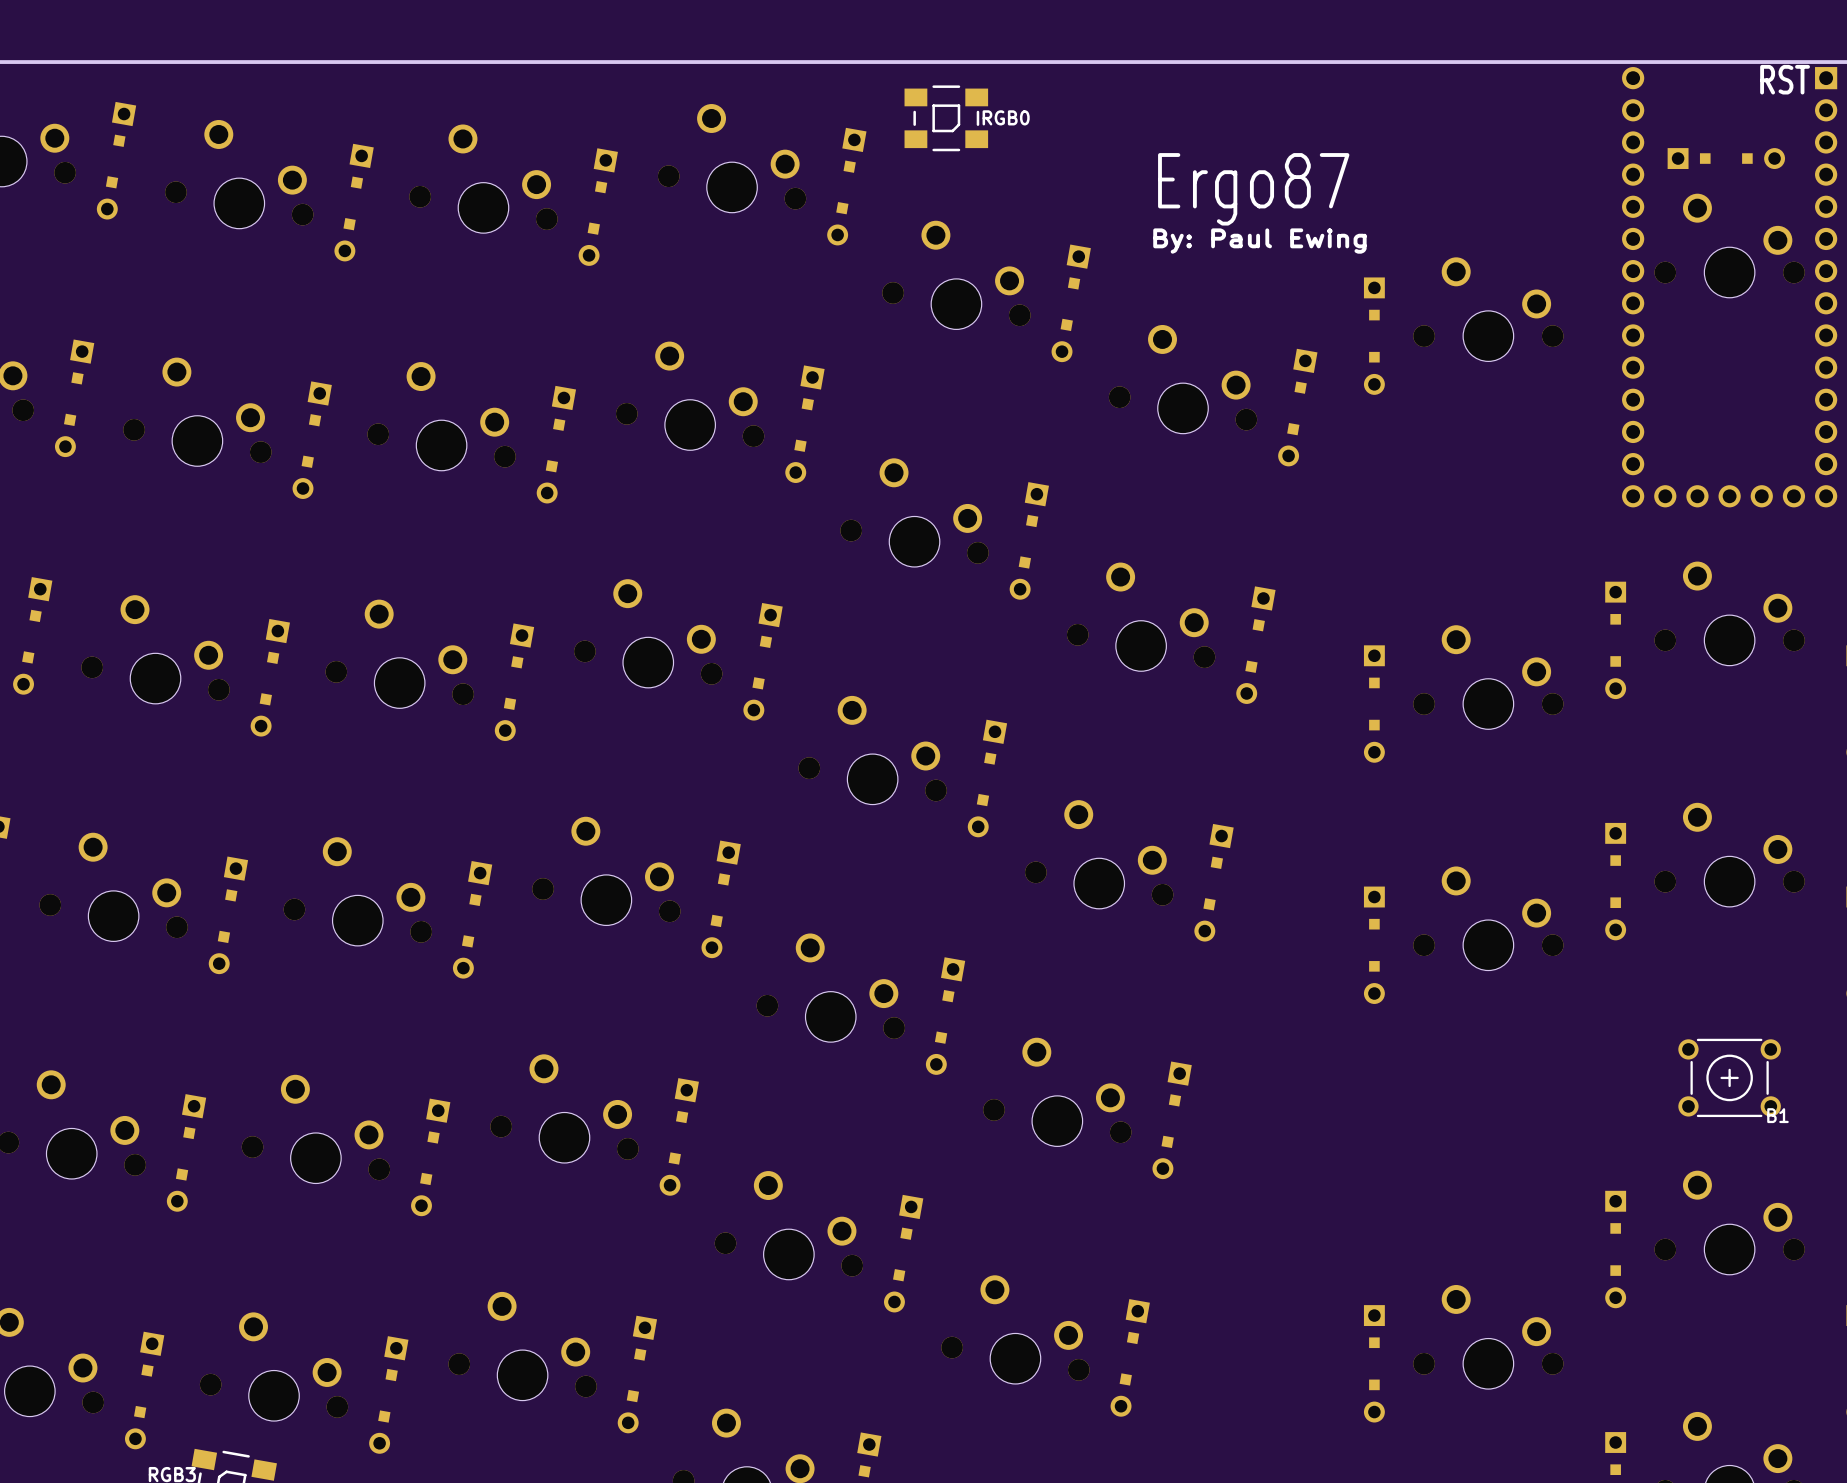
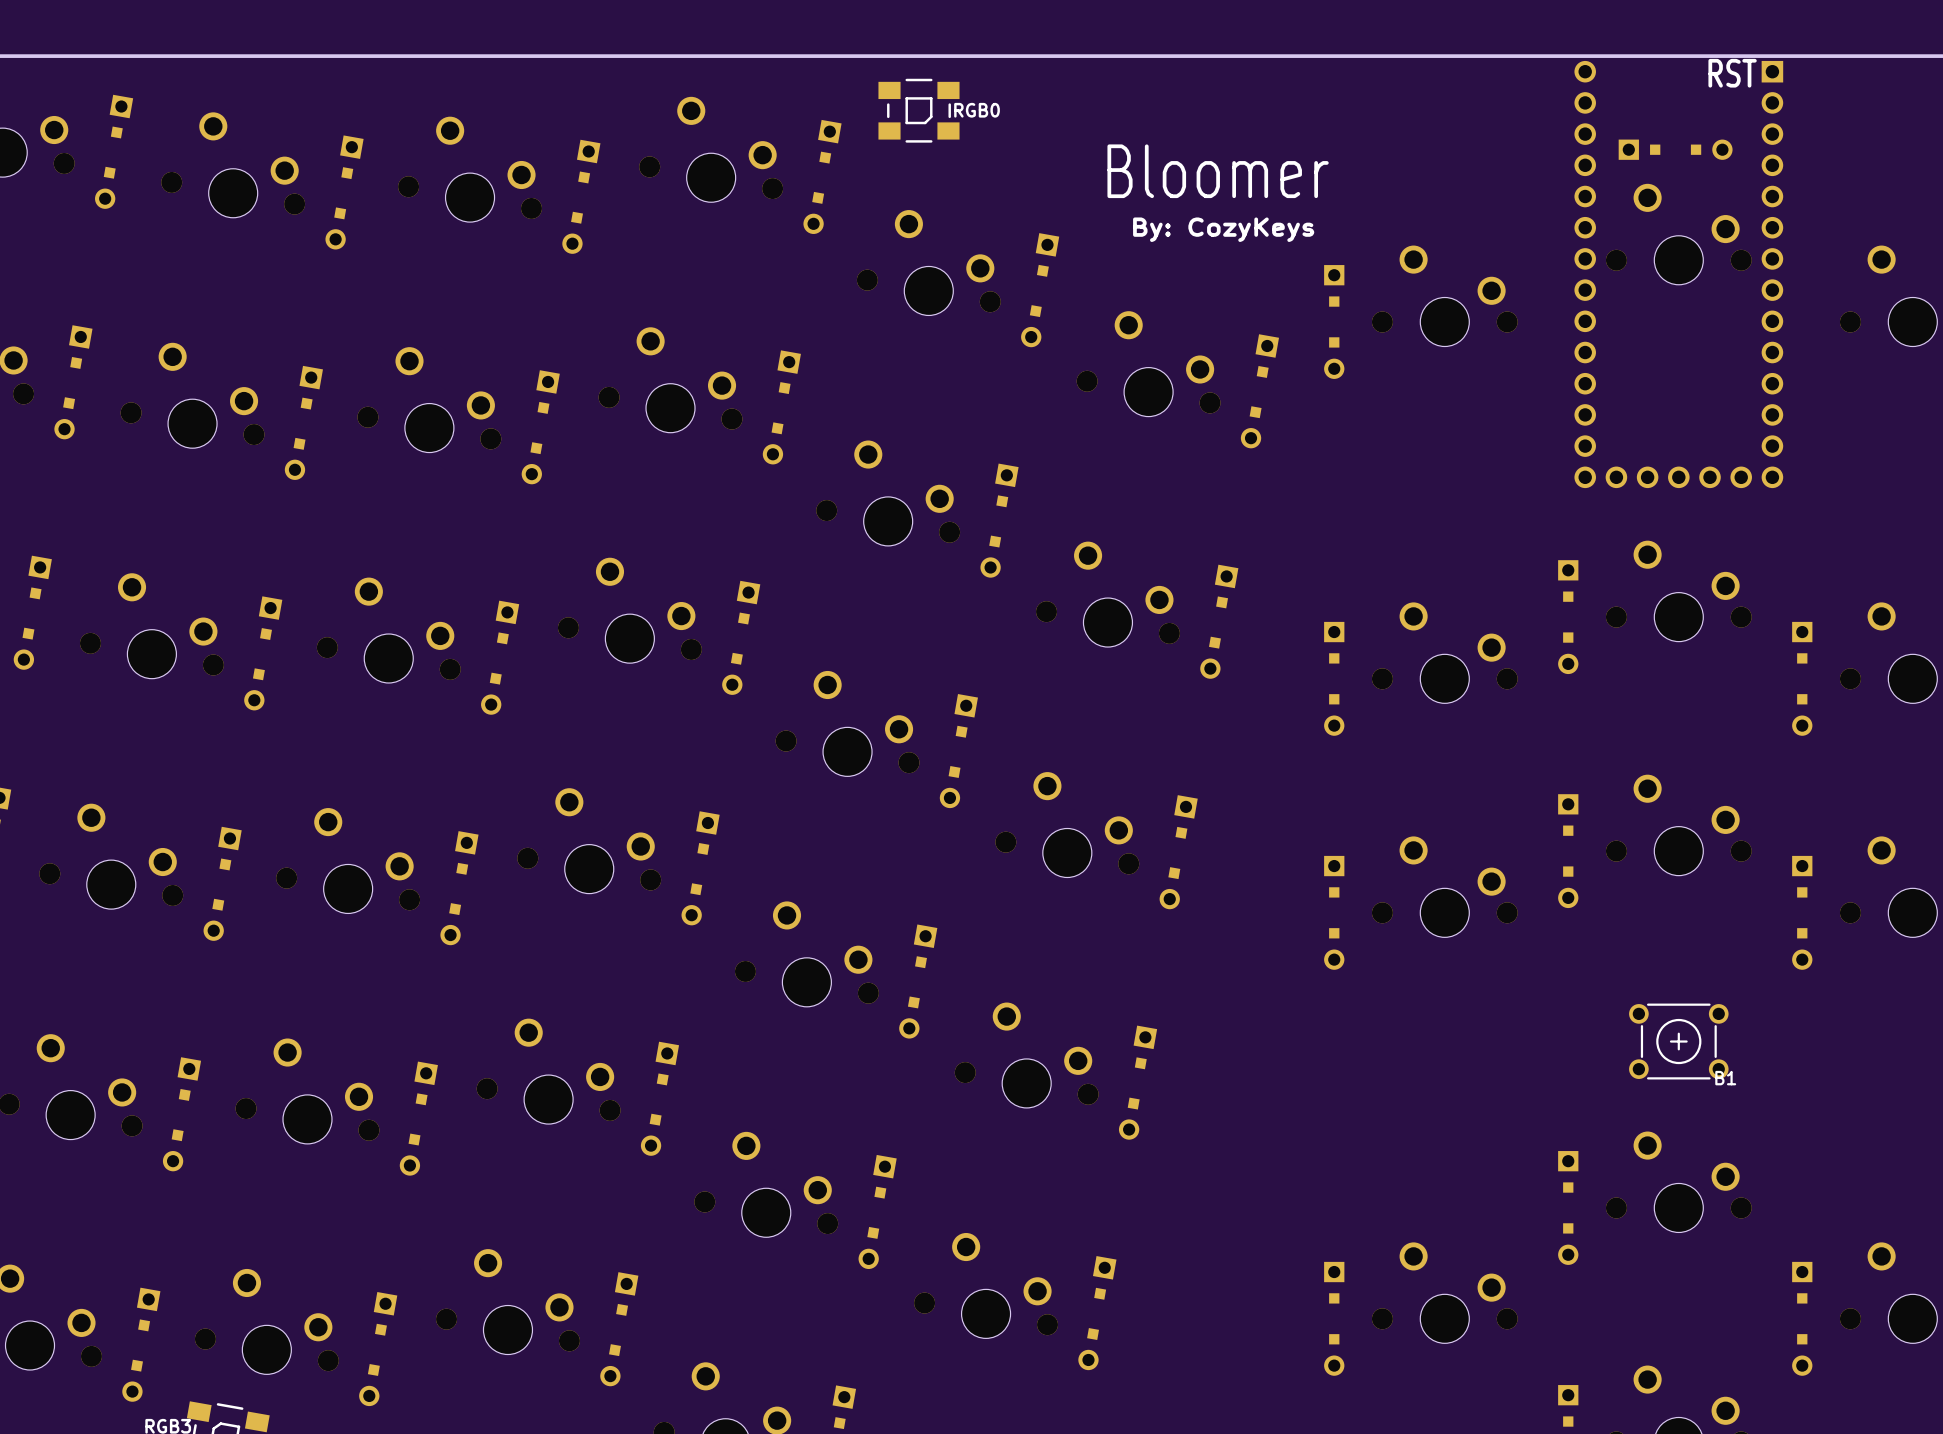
text: Ergo87 (1253, 189) -> Bloomer (1218, 171)
text: By: Paul Ewing (1259, 241) -> By: CozyKeys (1223, 229)

